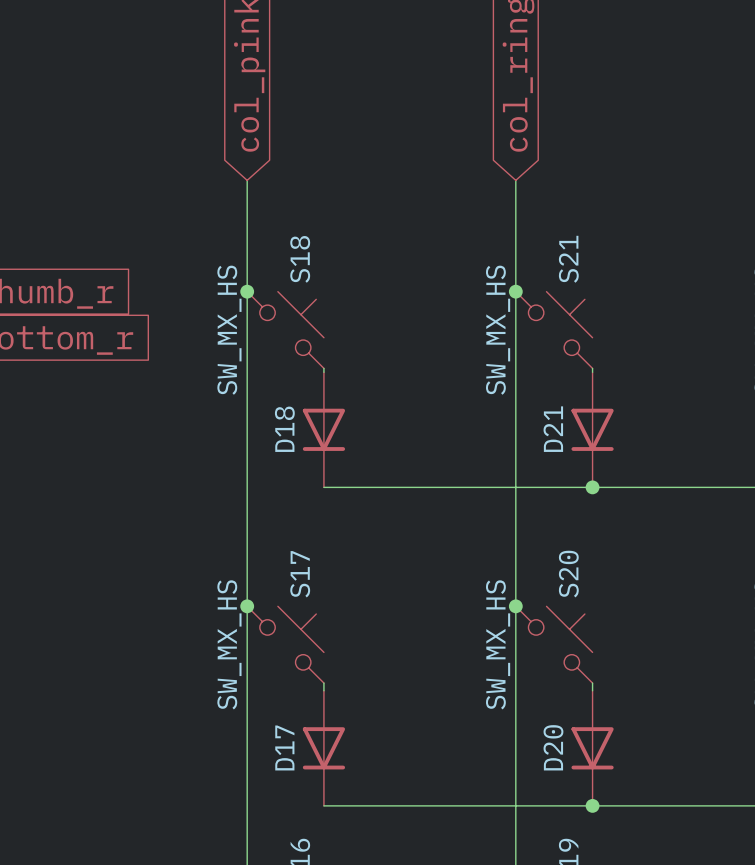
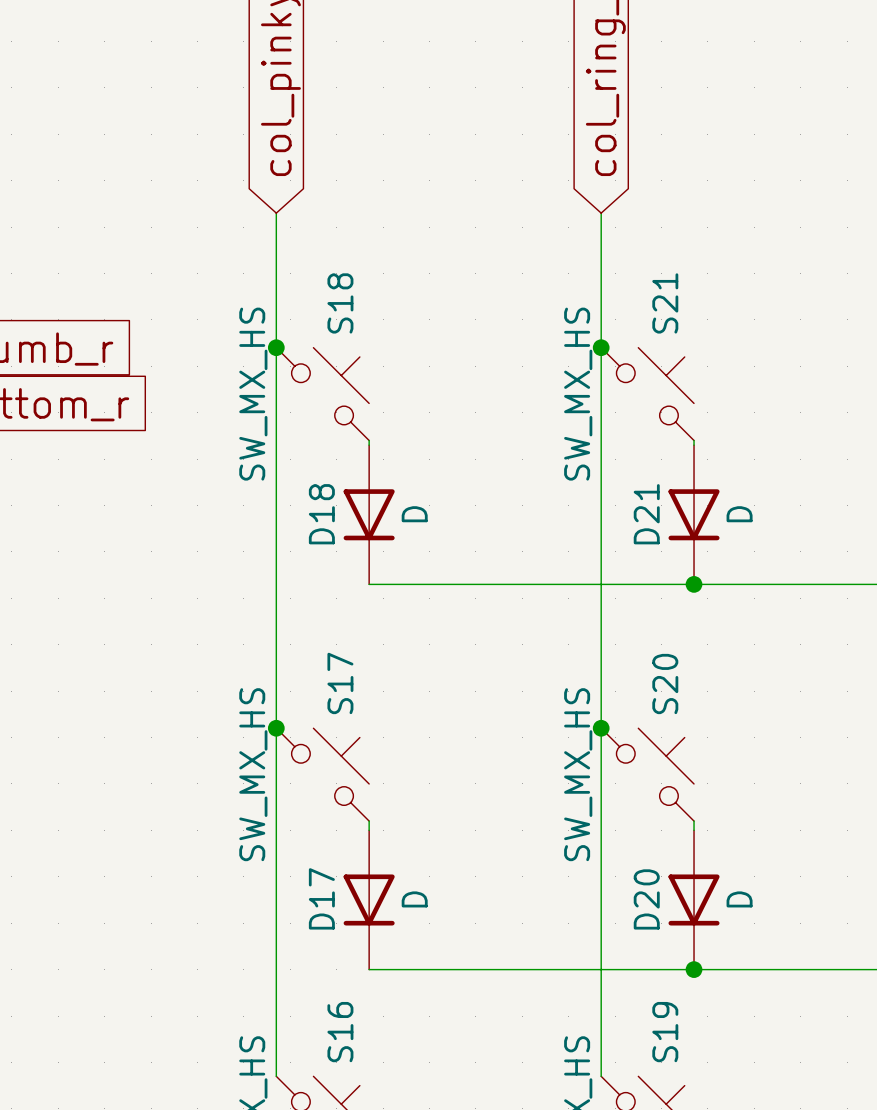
D18 value: none -> D (414, 514)
D21 value: none -> D (739, 514)
D17 value: none -> D (414, 899)
D20 value: none -> D (739, 899)

